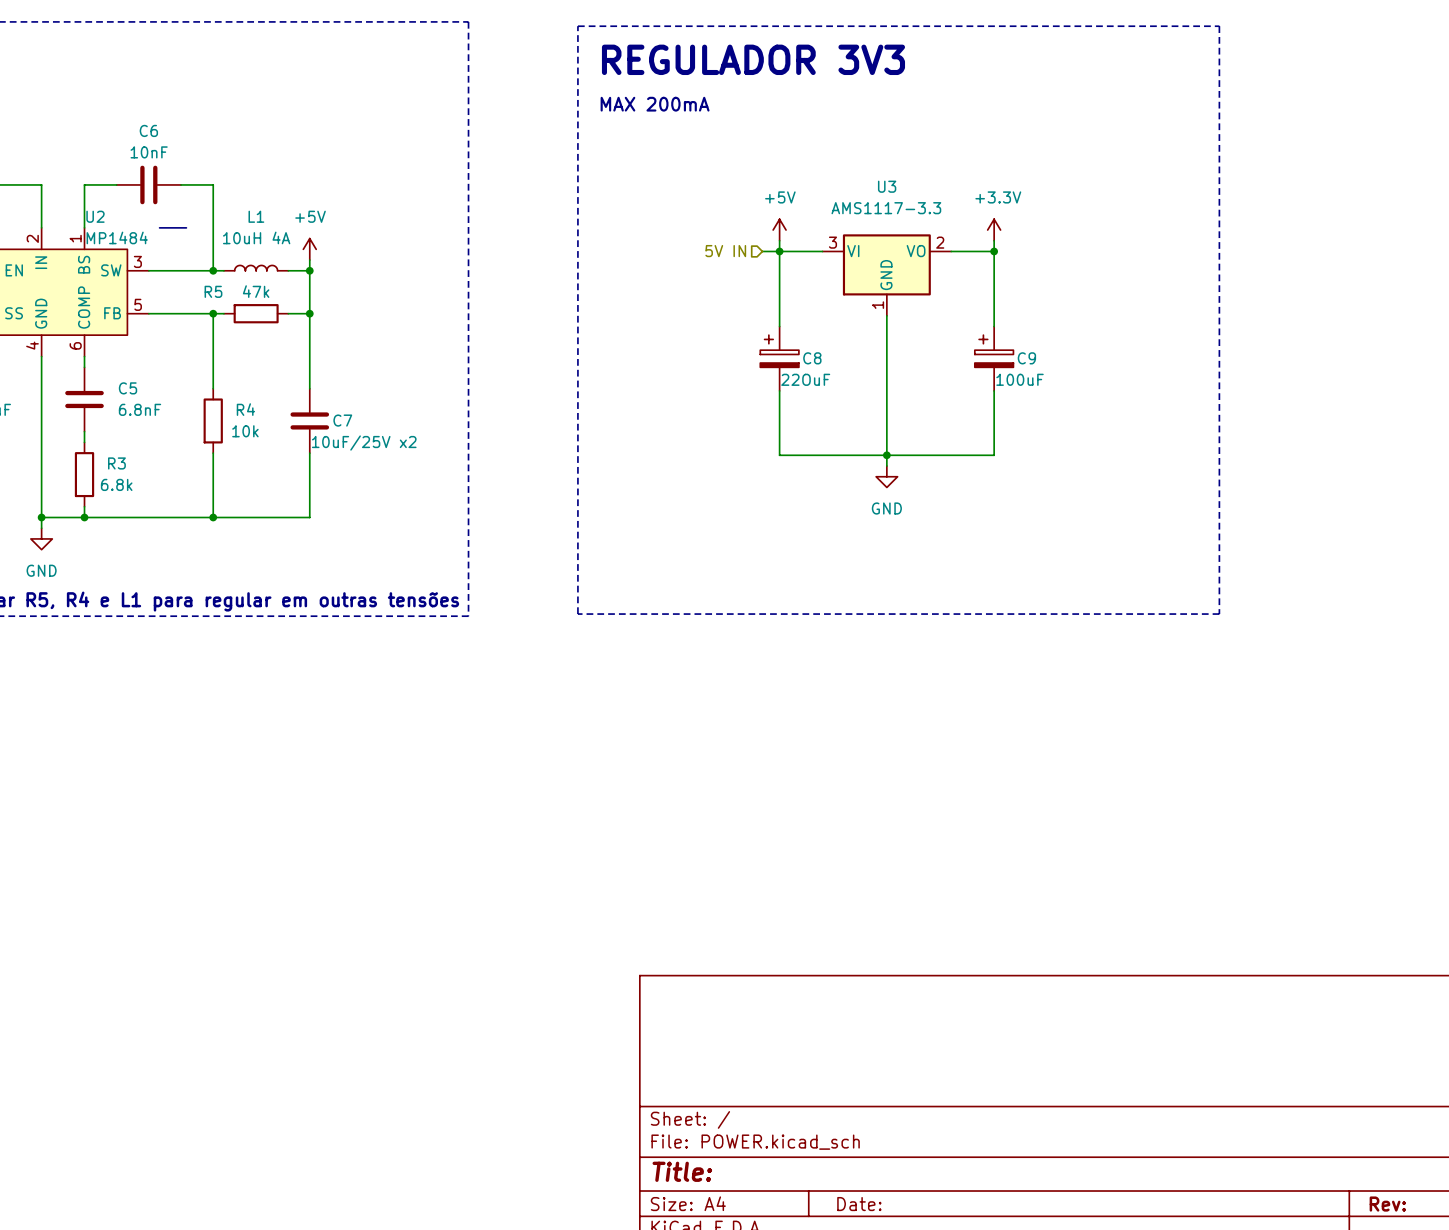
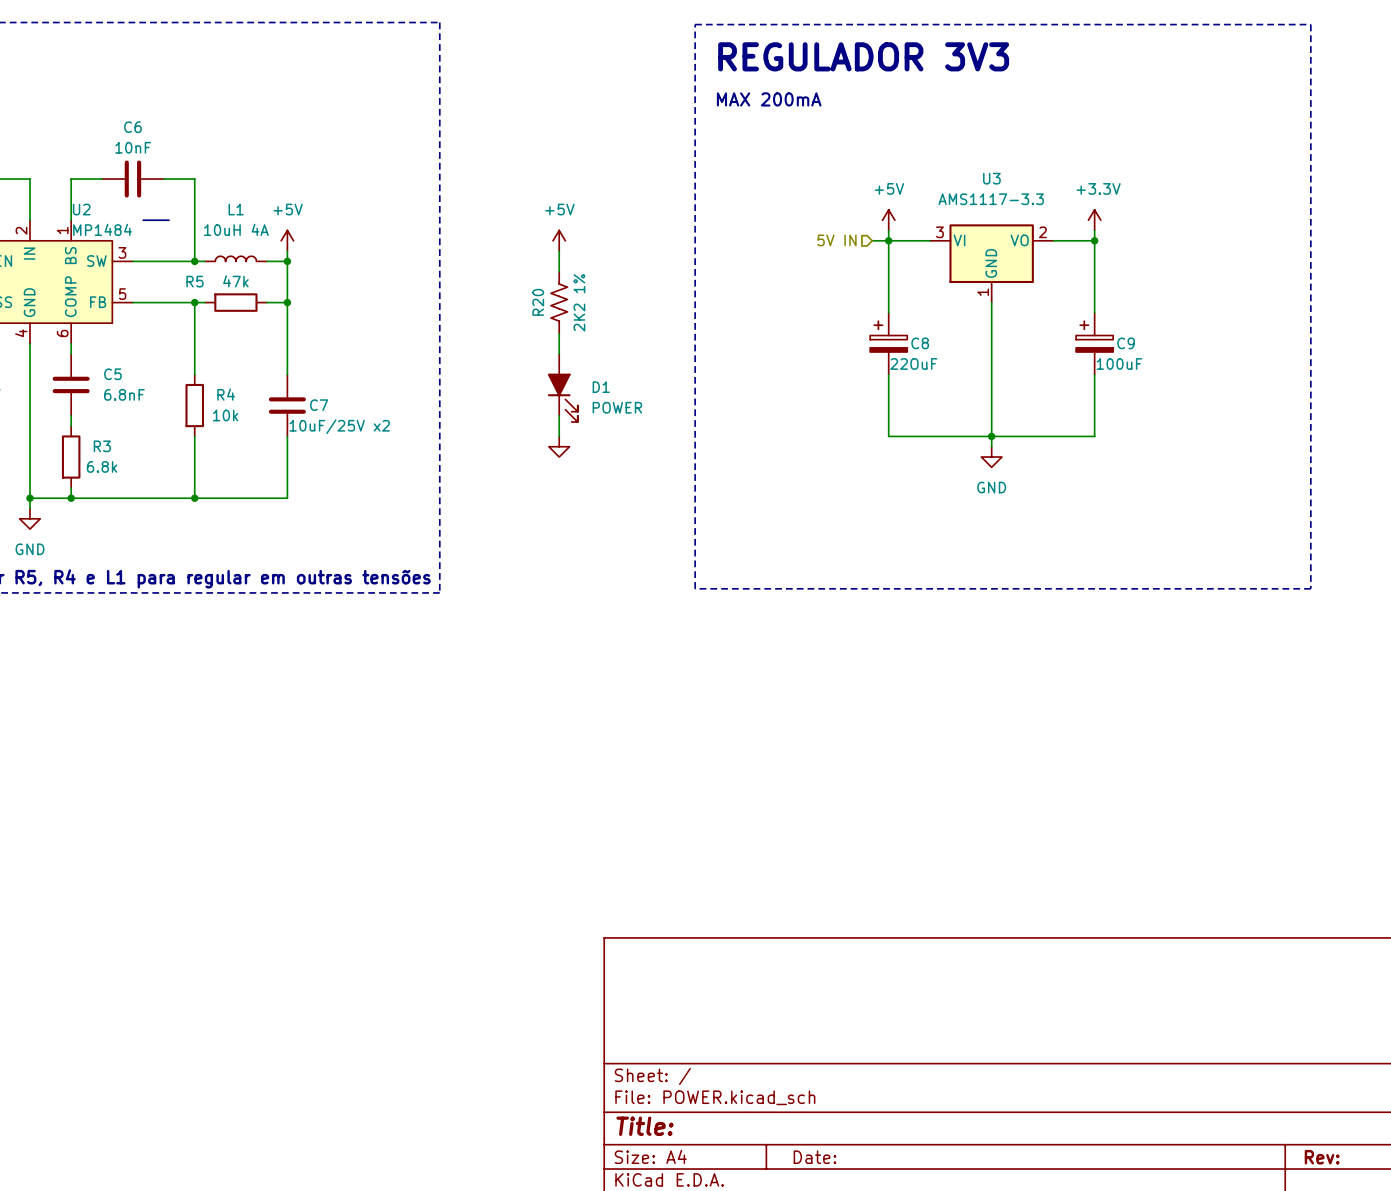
line: (577, 26) (1219, 26) (1219, 614) (577, 614) (577, 26) -> (695, 24) (1310, 24) (1310, 588) (695, 588) (695, 24)
text position: REGULADOR 3V3 (753, 59) -> REGULADOR 3V3 (863, 56)
text position: MAX 200mA (655, 104) -> MAX 200mA (769, 99)
power symbol: none -> +5V (888, 220)
power symbol: +5V (779, 230) -> none
power symbol position: +3.3V (994, 230) -> +3.3V (1094, 220)
wire: (779, 240) (779, 326) -> (888, 230) (888, 312)
wire: (994, 240) (994, 326) -> (1094, 230) (1094, 312)
power symbol: none -> +5V (559, 240)
junction: none -> (888, 240)
junction: none -> (1094, 240)
hierarchical label position: 5V IN (725, 251) -> 5V IN (837, 240)
wire: (762, 251) (822, 251) -> (872, 240) (929, 240)
junction: (779, 251) -> none
wire: (951, 251) (994, 251) -> (1053, 240) (1094, 240)
junction: (994, 251) -> none
wire: none -> (559, 251) (559, 271)
U3 position: (886, 275) -> (991, 263)
R20: none -> 2K2 1% (559, 302)
wire: (886, 315) (886, 466) -> (991, 302) (991, 446)
wire: none -> (559, 333) (559, 354)
C8 position: (779, 358) -> (888, 343)
C9 position: (994, 358) -> (1094, 343)
wire: (779, 390) (779, 455) (994, 455) (994, 390) -> (888, 374) (888, 436) (1094, 436) (1094, 374)
D1: none -> POWER (562, 388)
wire: none -> (559, 415) (559, 436)
junction: none -> (991, 436)
junction: (886, 455) -> none
power symbol: none -> (559, 446)
power symbol position: GND (886, 476) -> GND (991, 457)

